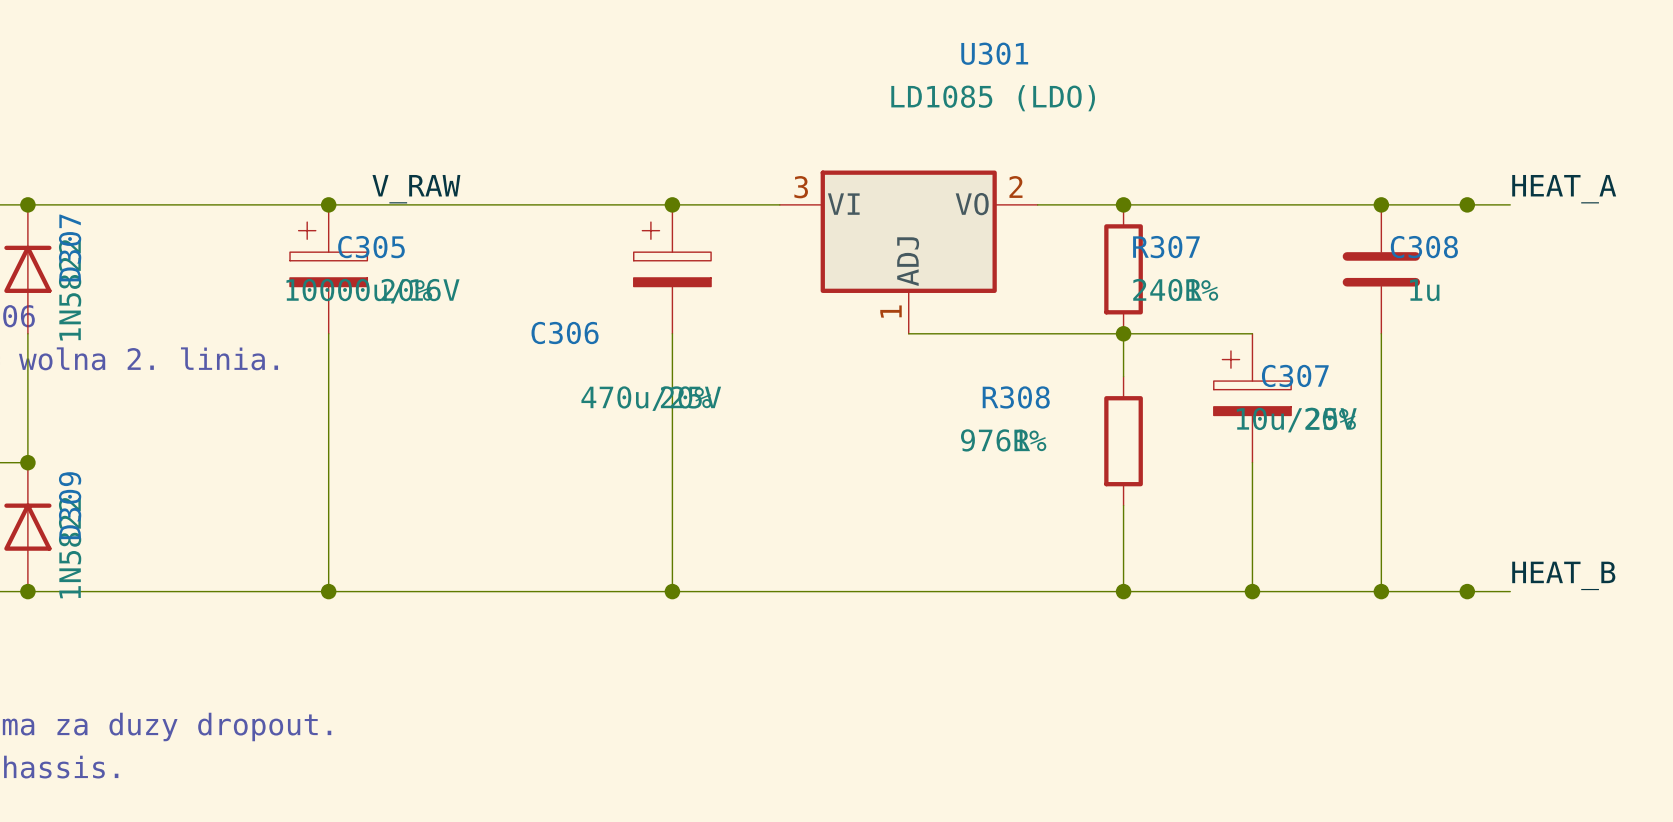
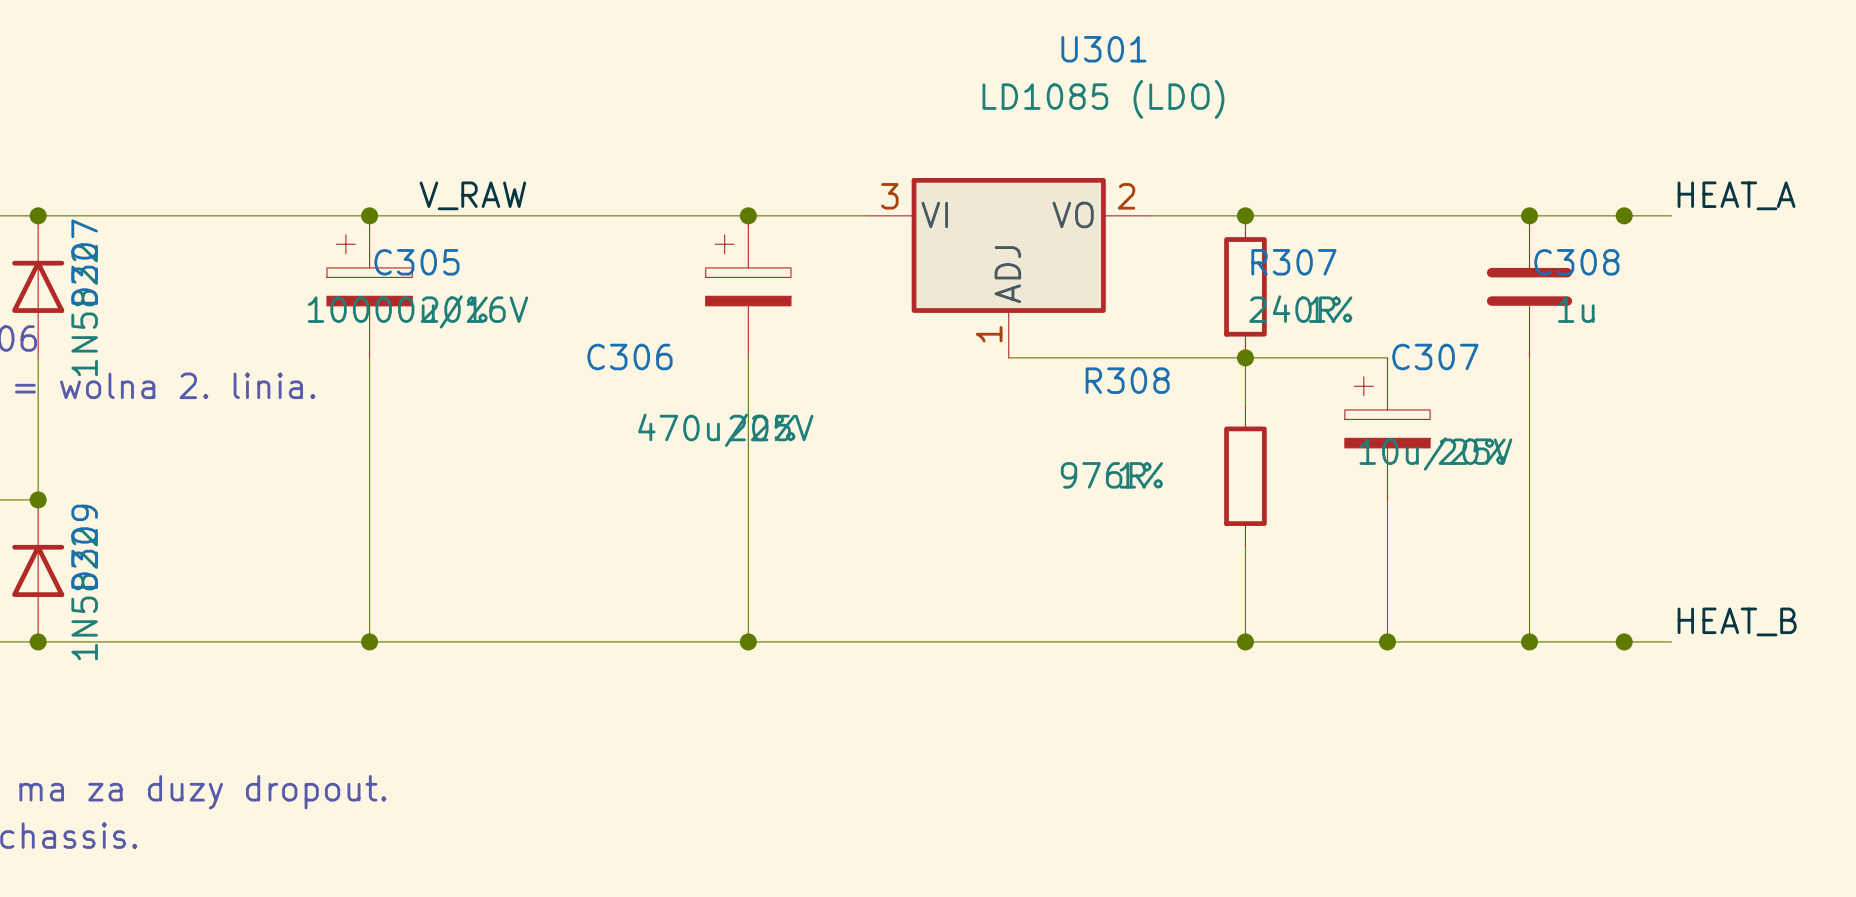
C307 name position: C307 (1295, 375) -> C307 (1435, 356)
R308 name position: R308 (1016, 397) -> R308 (1127, 380)

